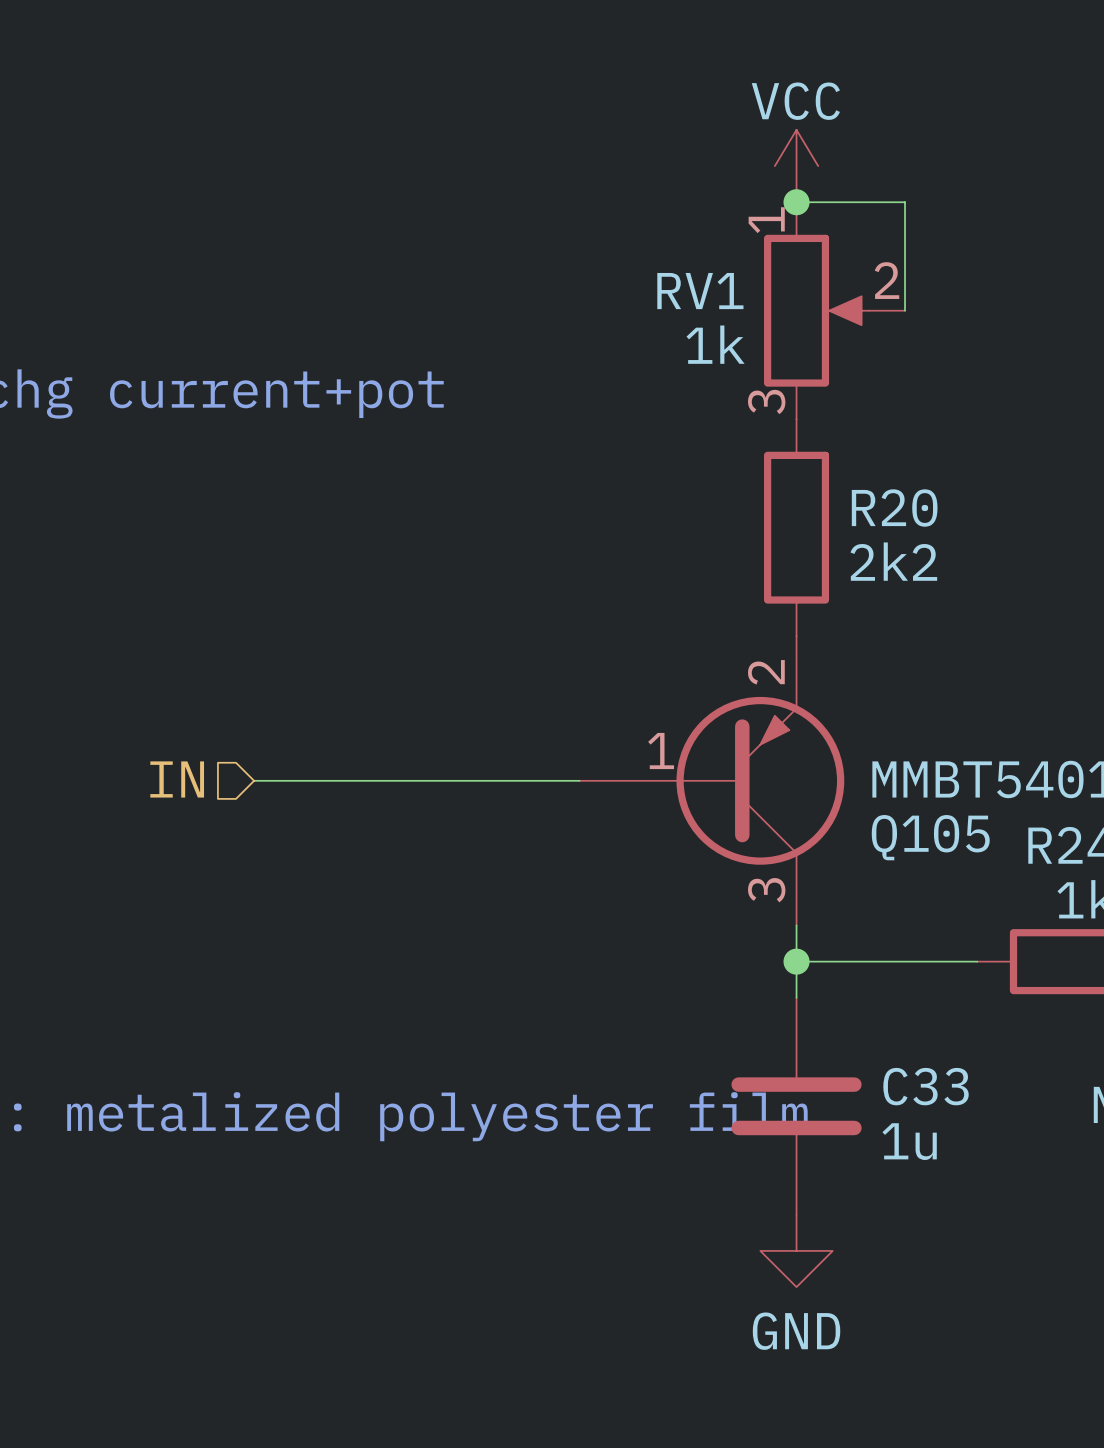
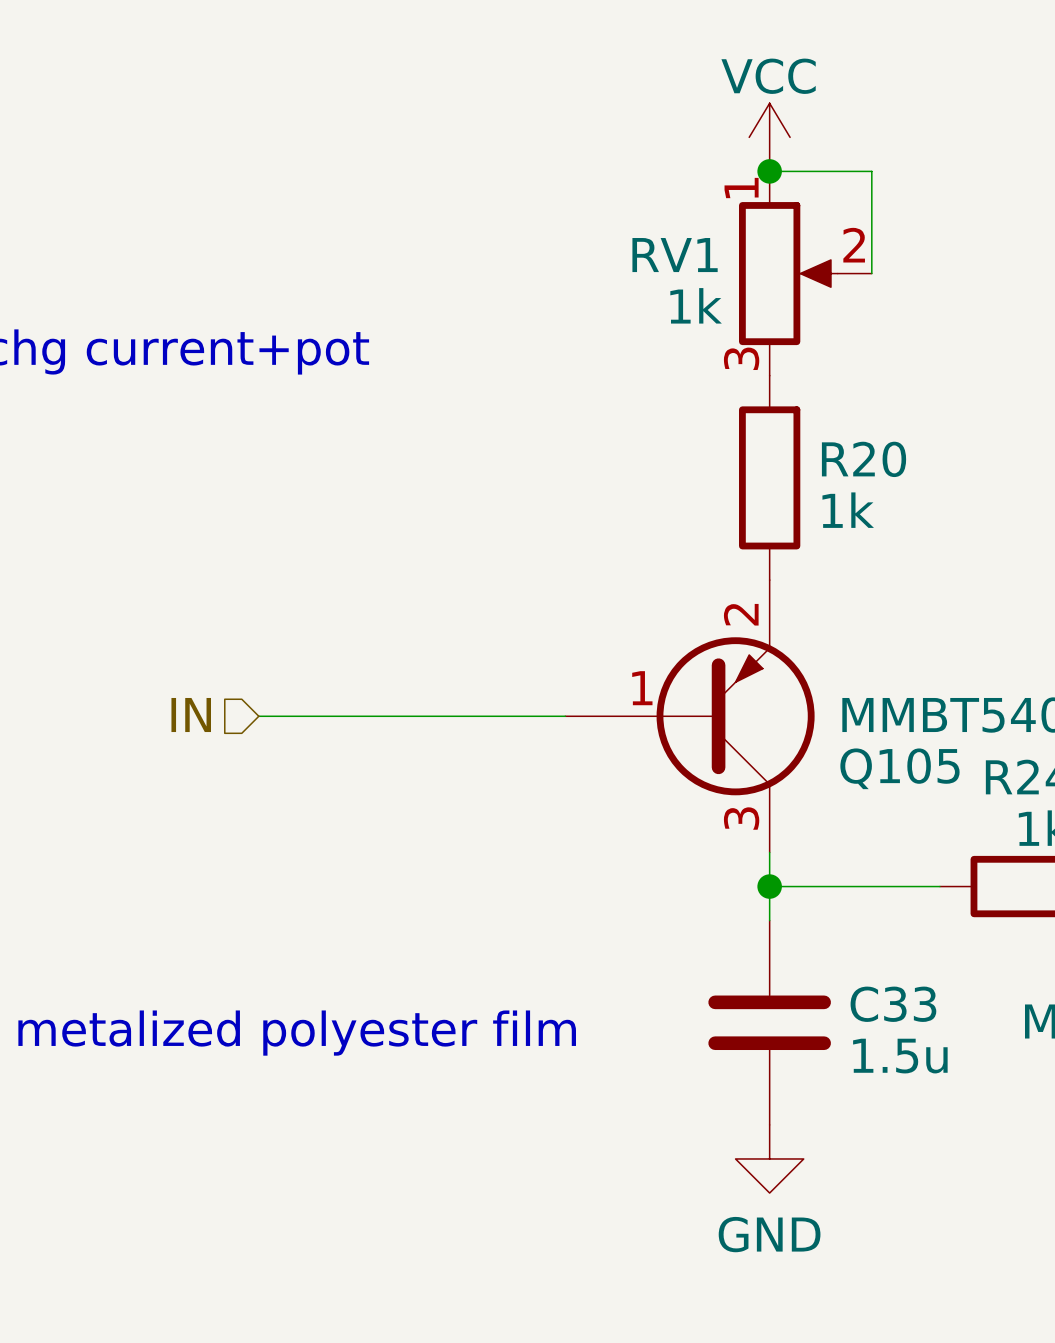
R20 value: 2k2 (893, 561) -> 1k (848, 510)
C33 value: 1u (909, 1141) -> 1.5u (900, 1056)

